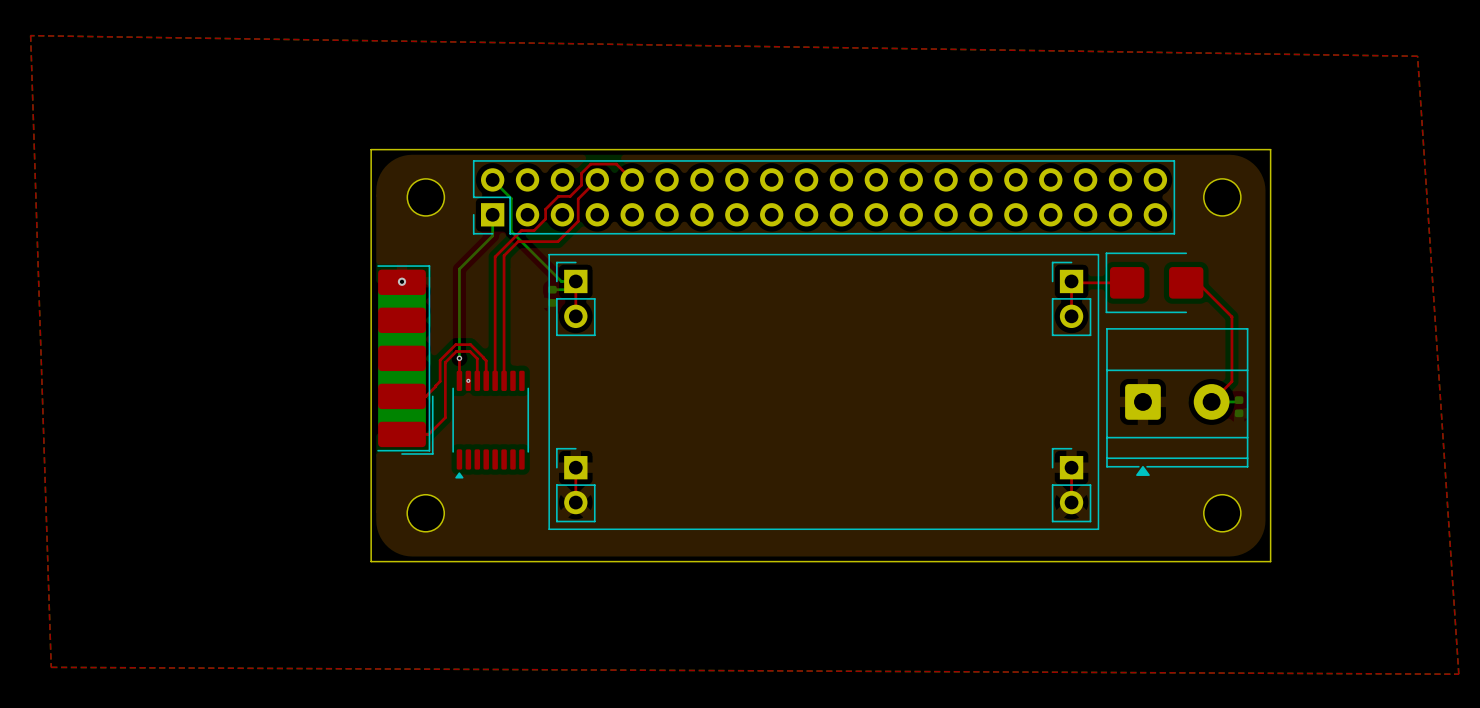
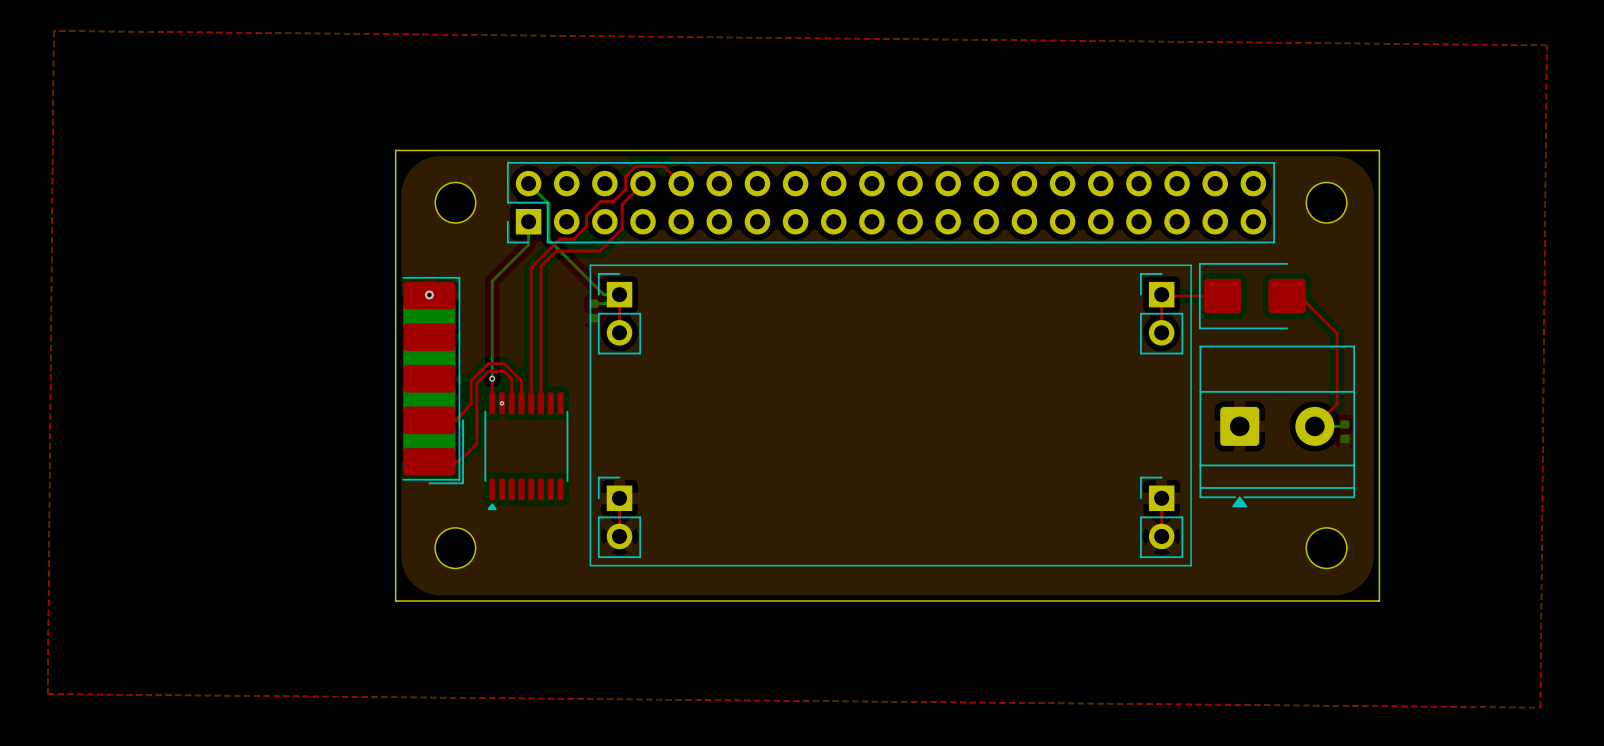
top zone outline: (30, 35) (51, 667) (1458, 674) (1417, 56) (30, 35) -> (53, 30) (47, 694) (1540, 707) (1546, 45) (53, 30)

